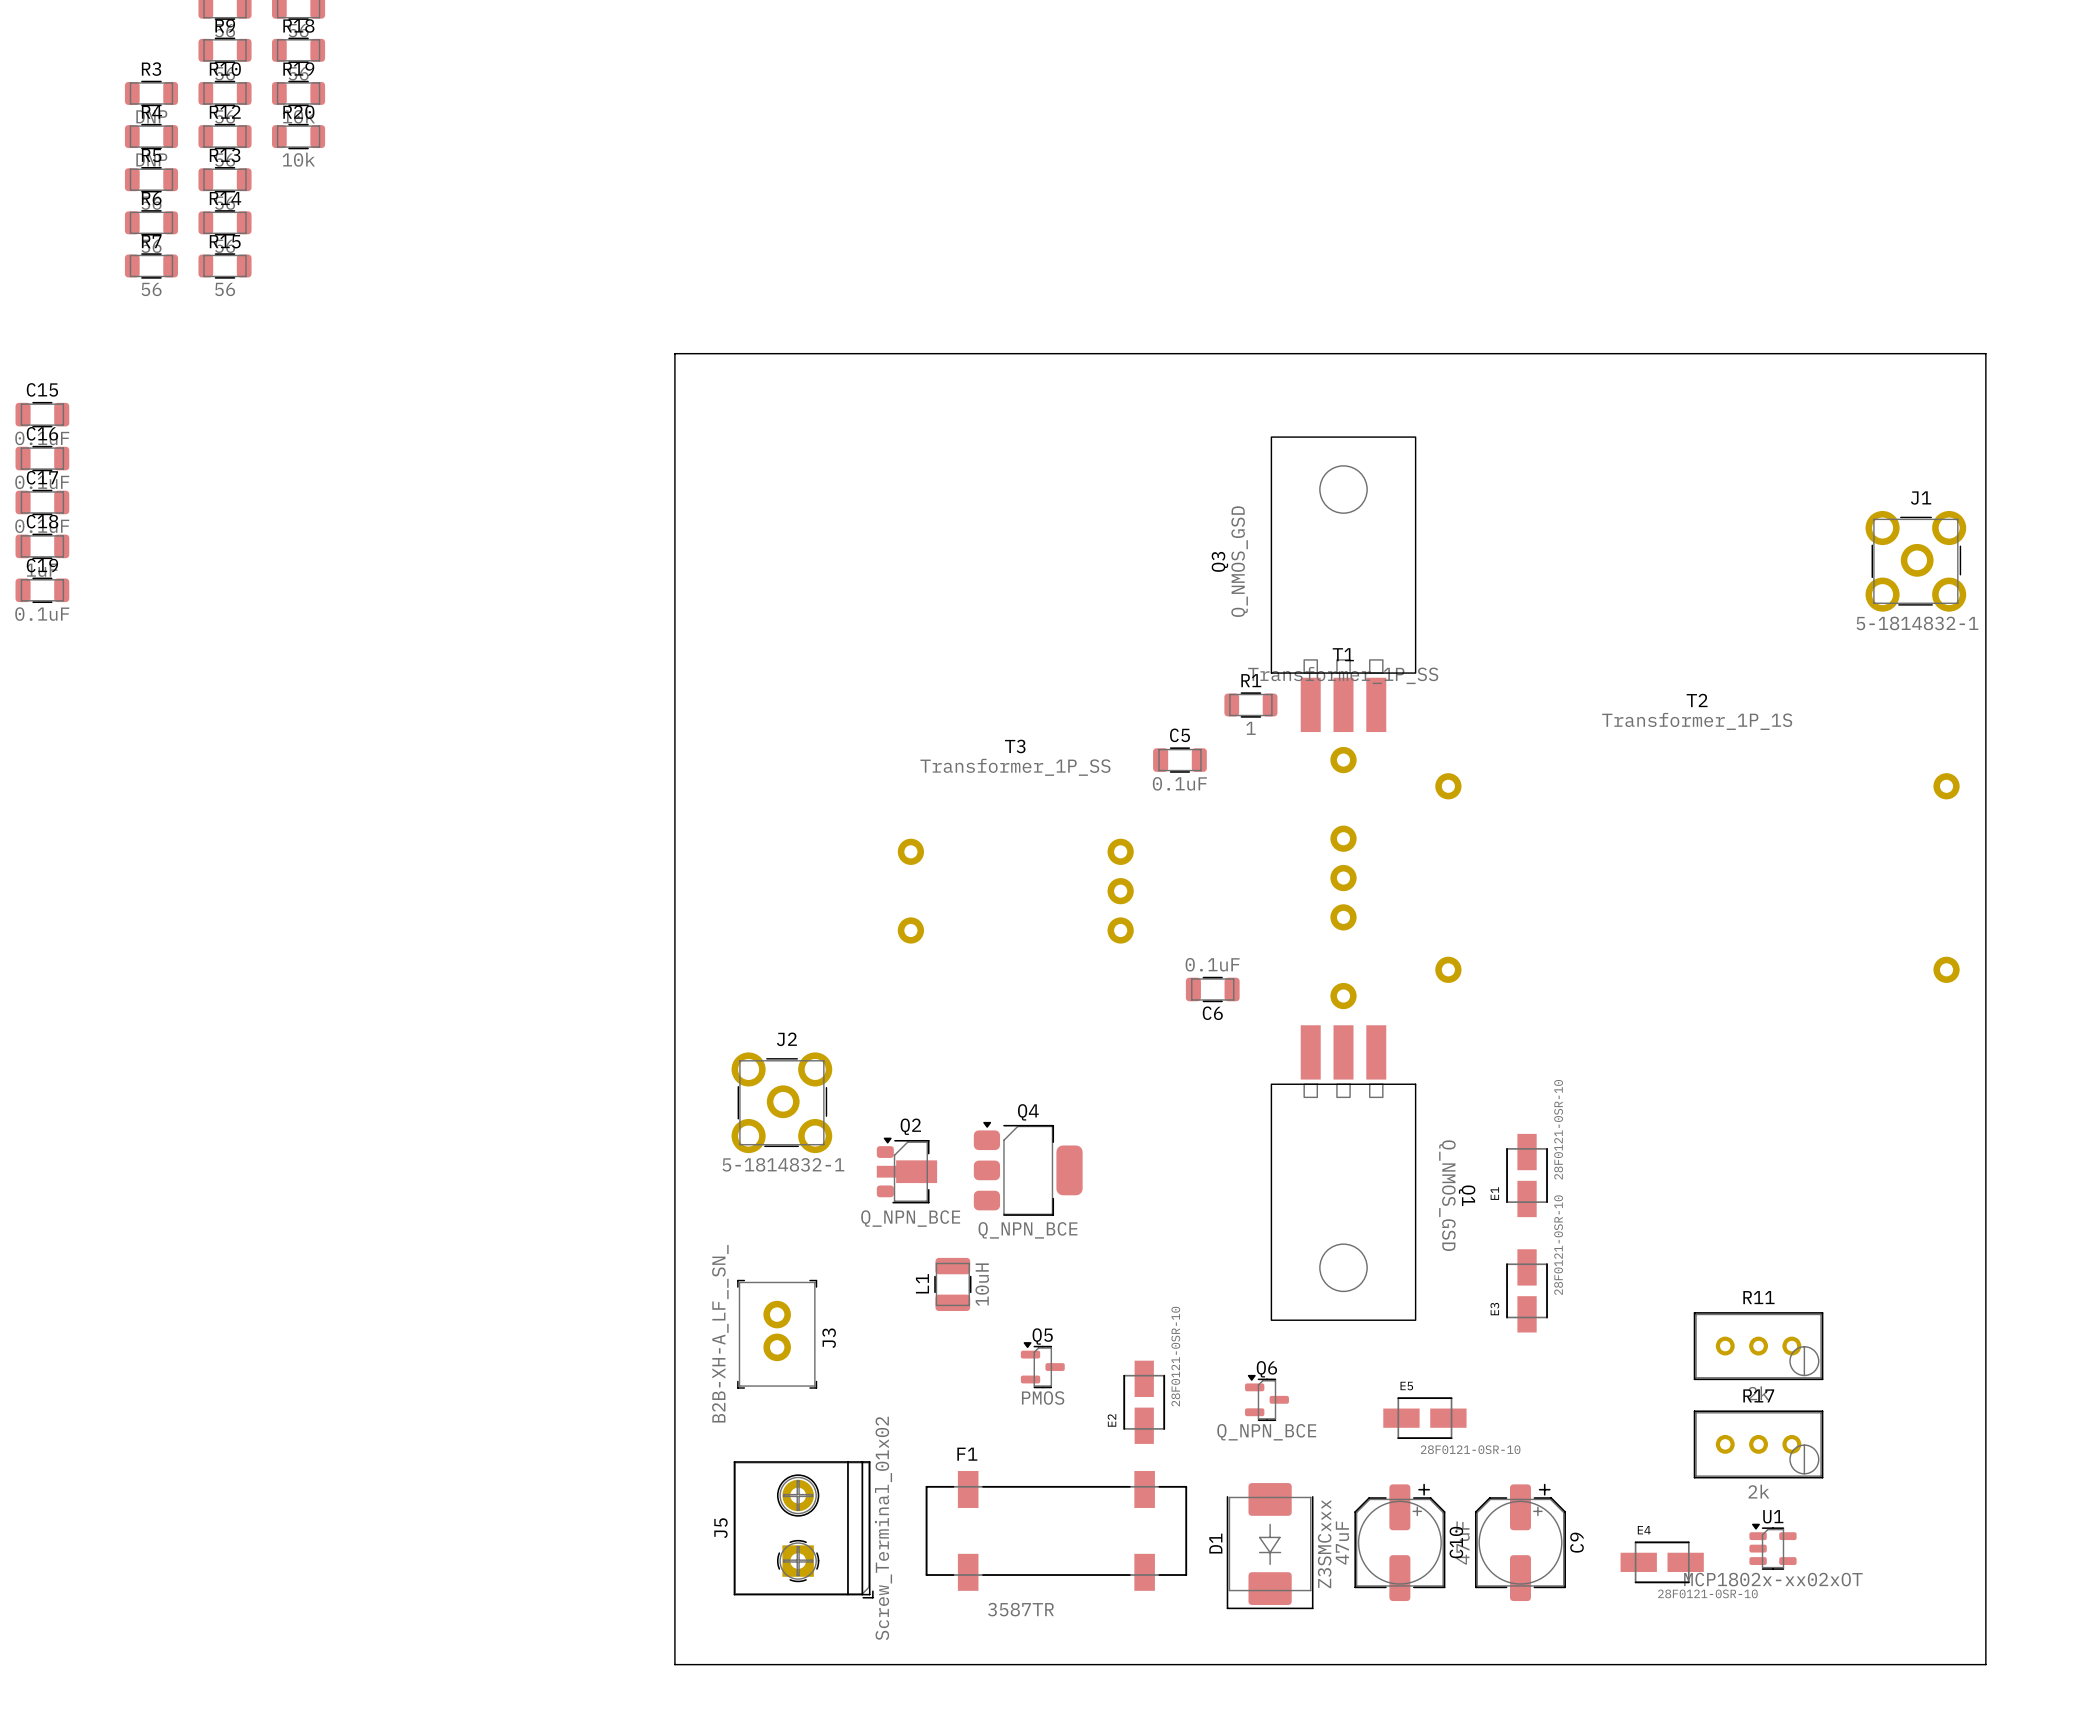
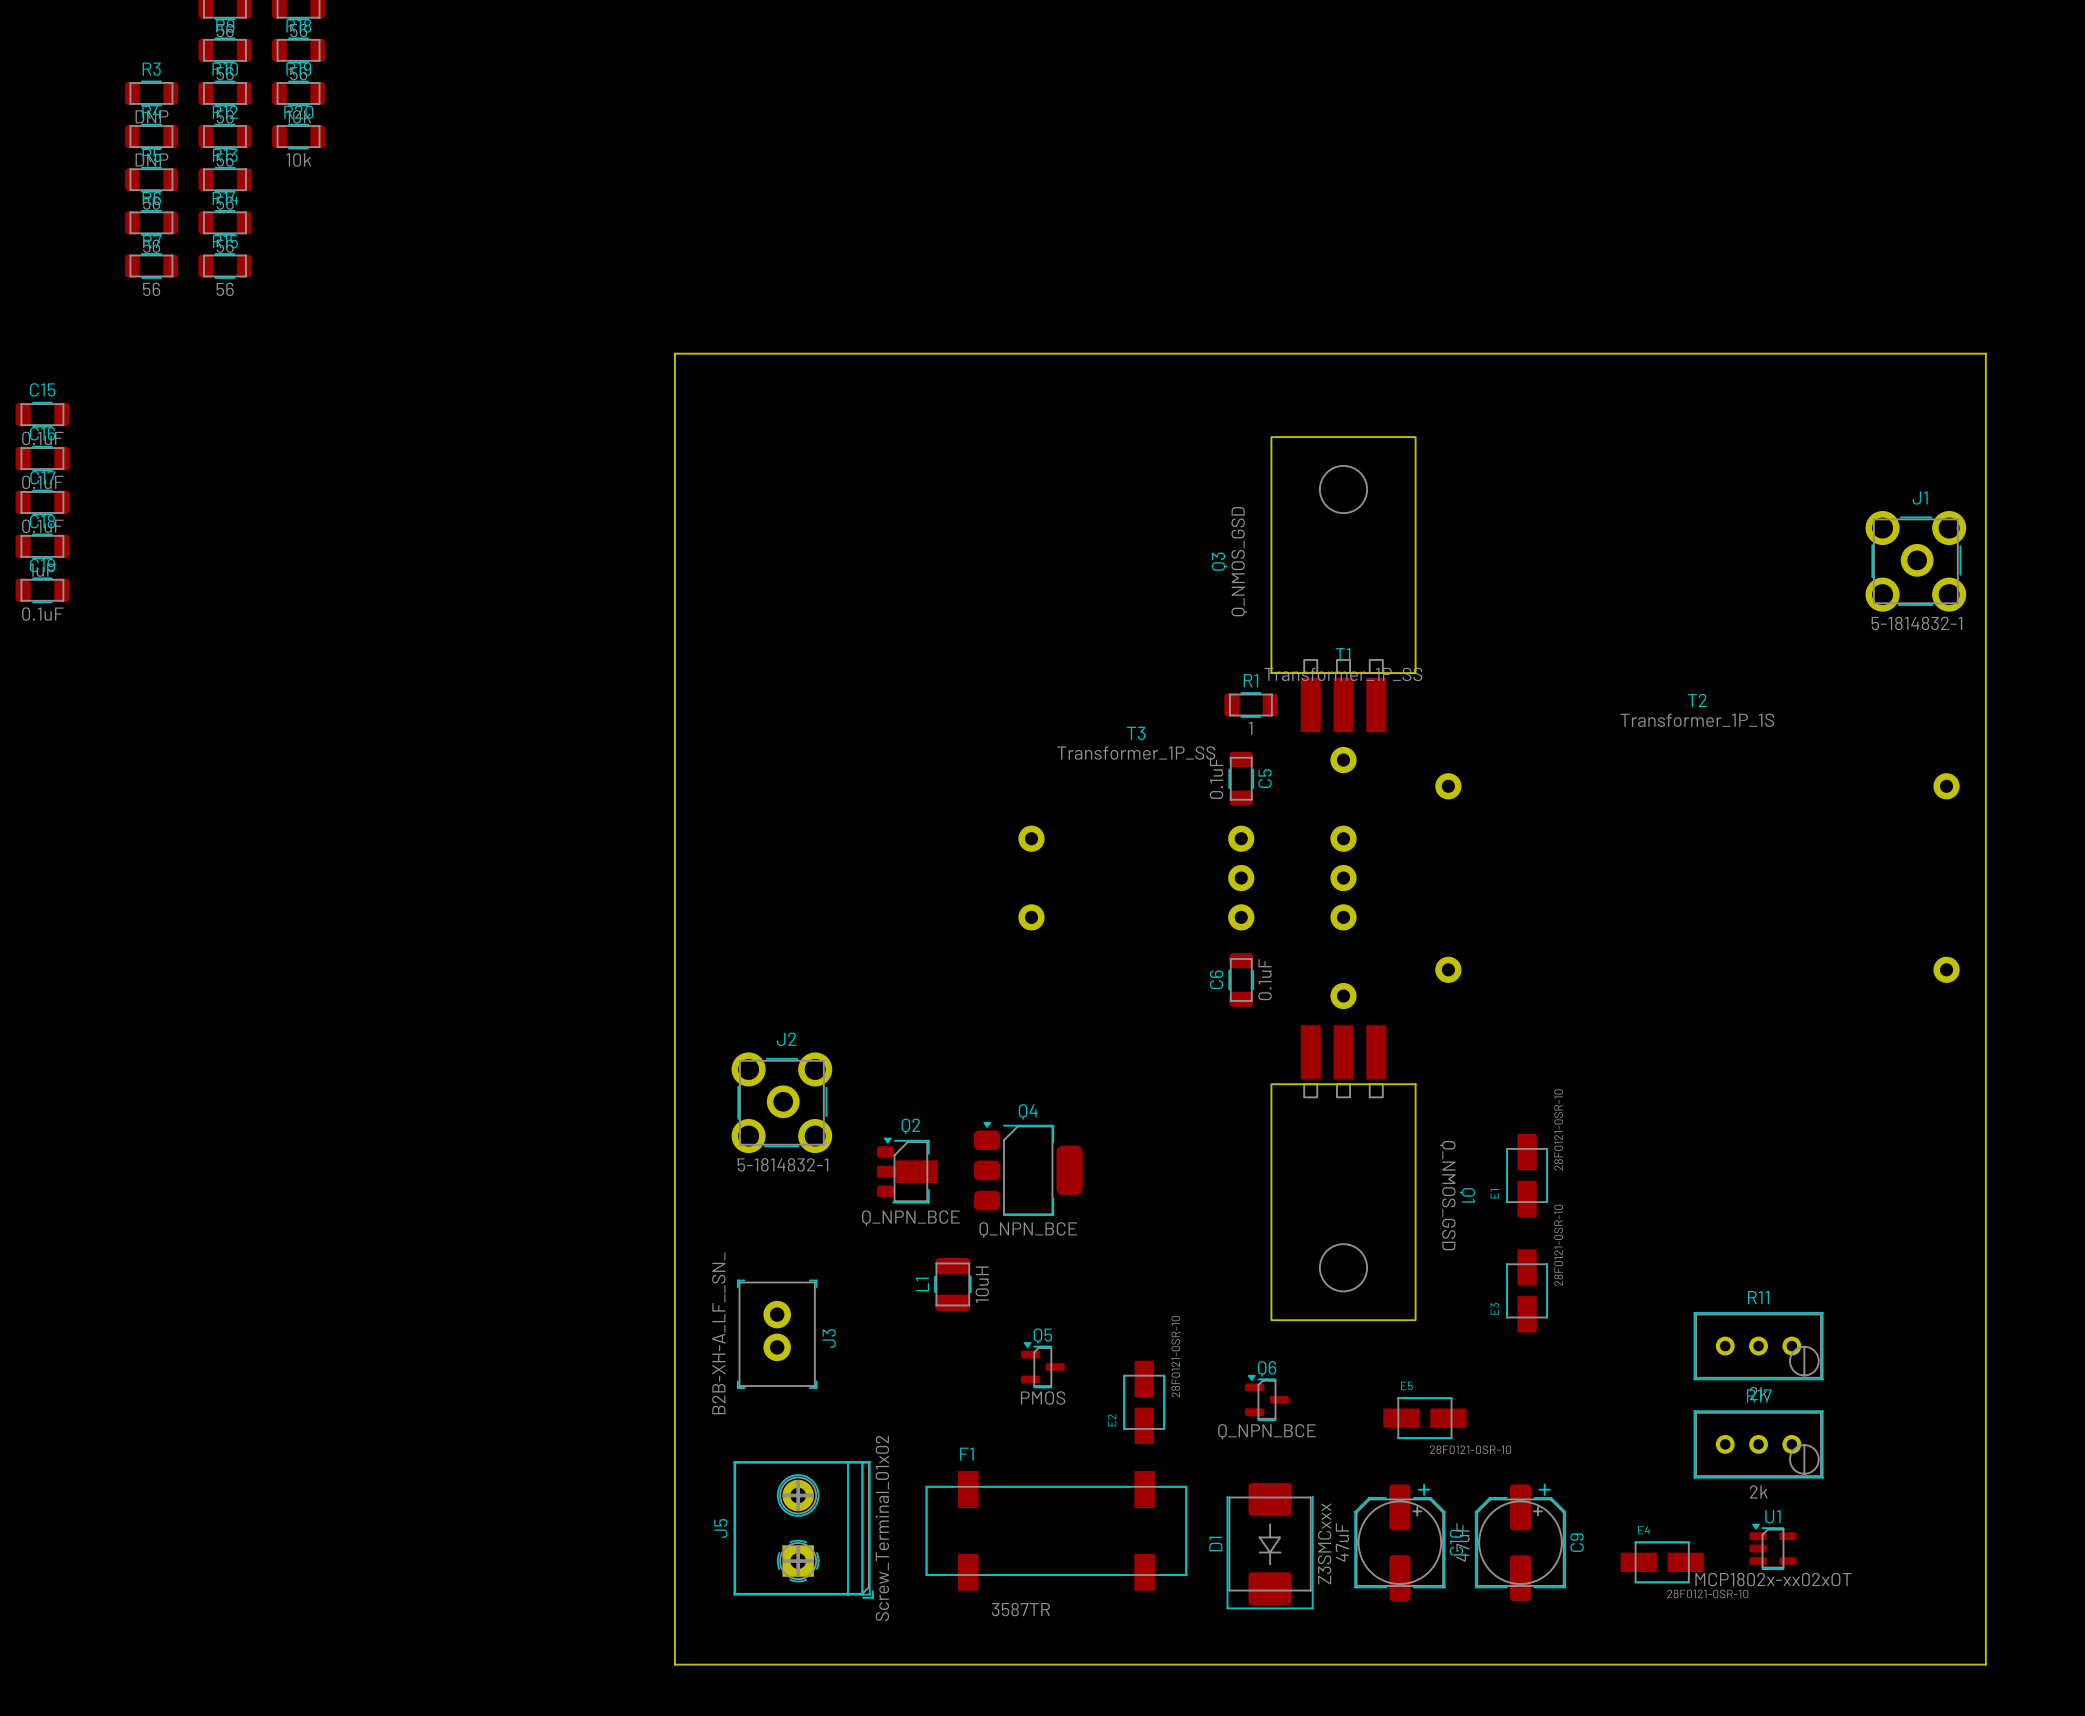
C5 rotation: 0° (1179, 760) -> 90° clockwise (1241, 778)
C5 position: (1179, 760) -> (1241, 778)
T3 position: (1015, 891) -> (1136, 878)
C6 rotation: 0° (1212, 989) -> 90° clockwise (1241, 979)

